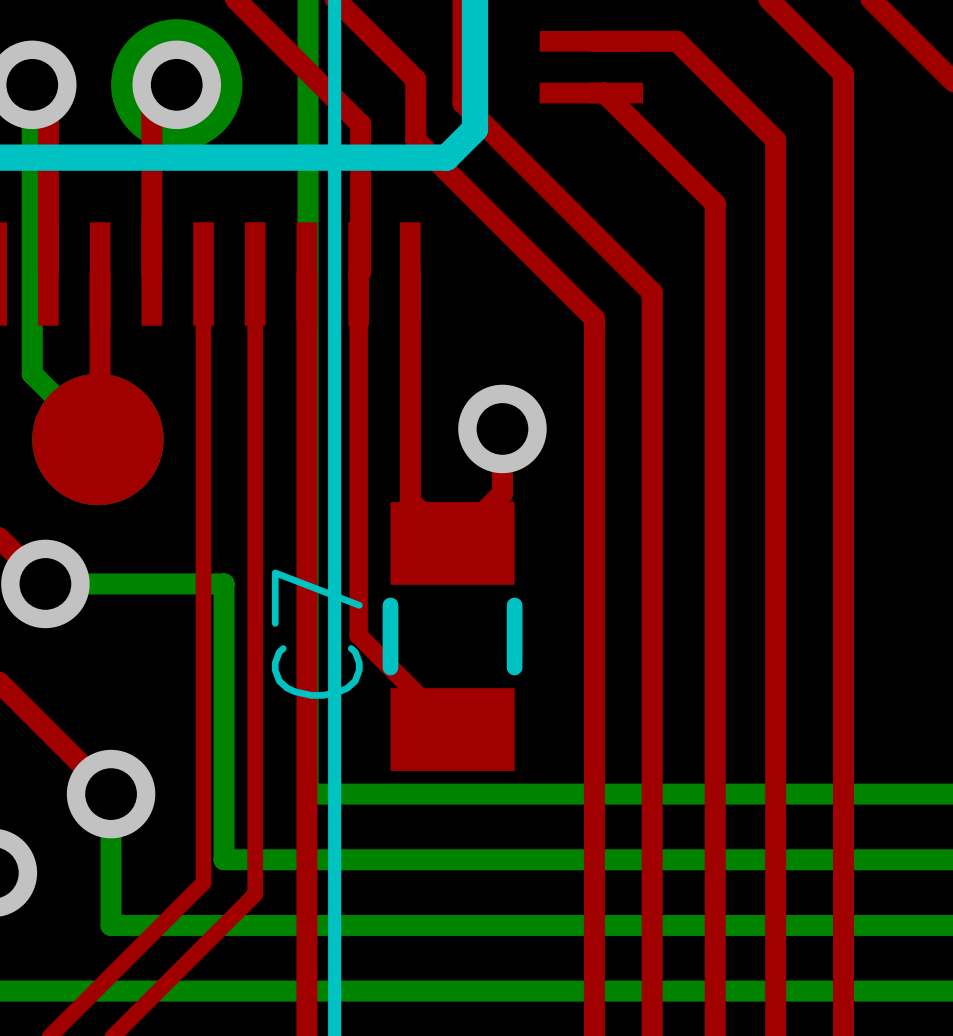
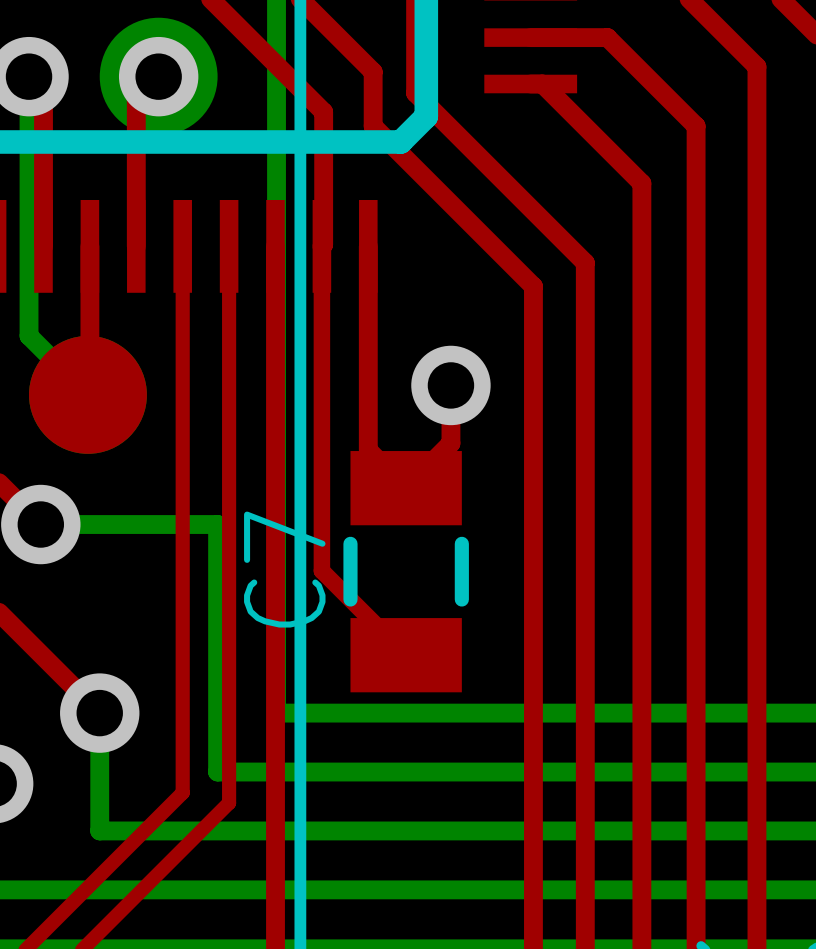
bottom track: (224, 583) (224, 859) (242, 859) -> (201, 524) (217, 524) (217, 772)

